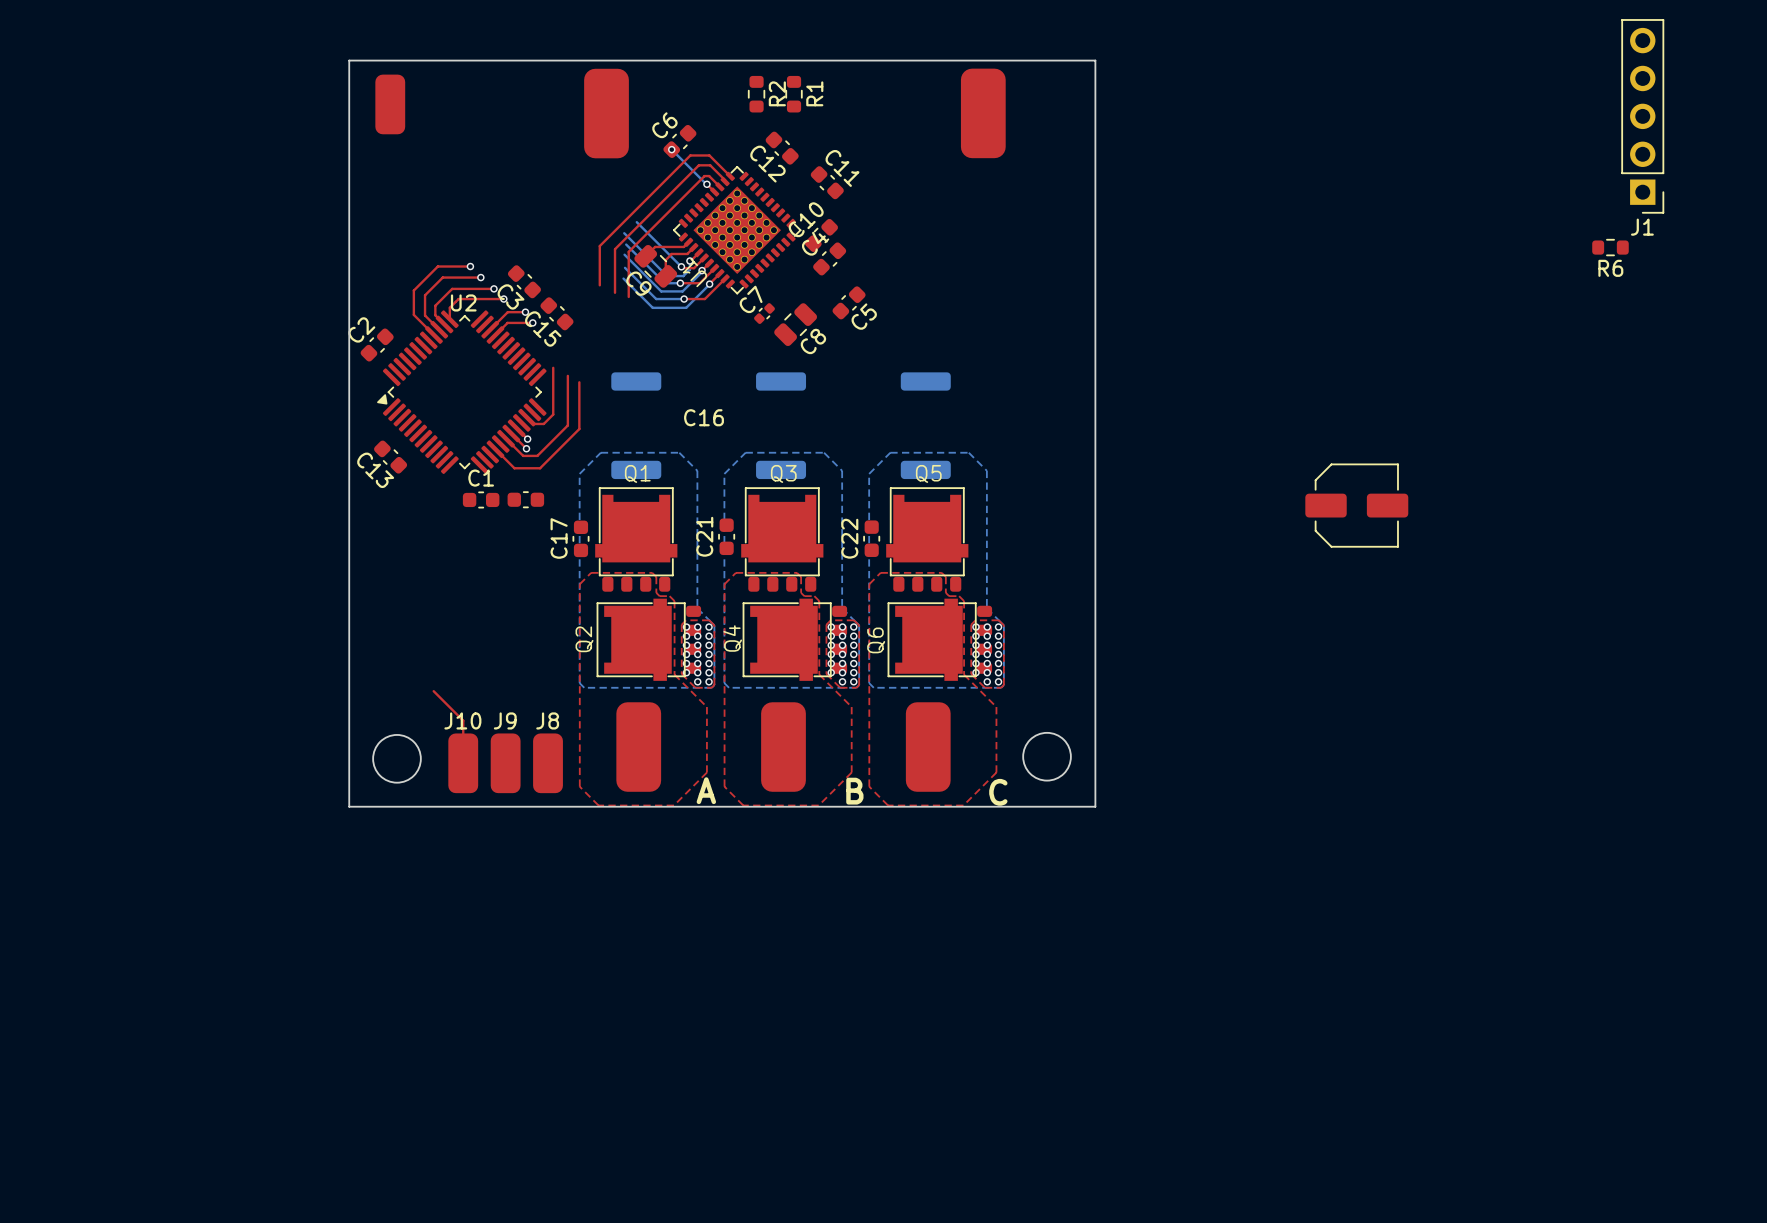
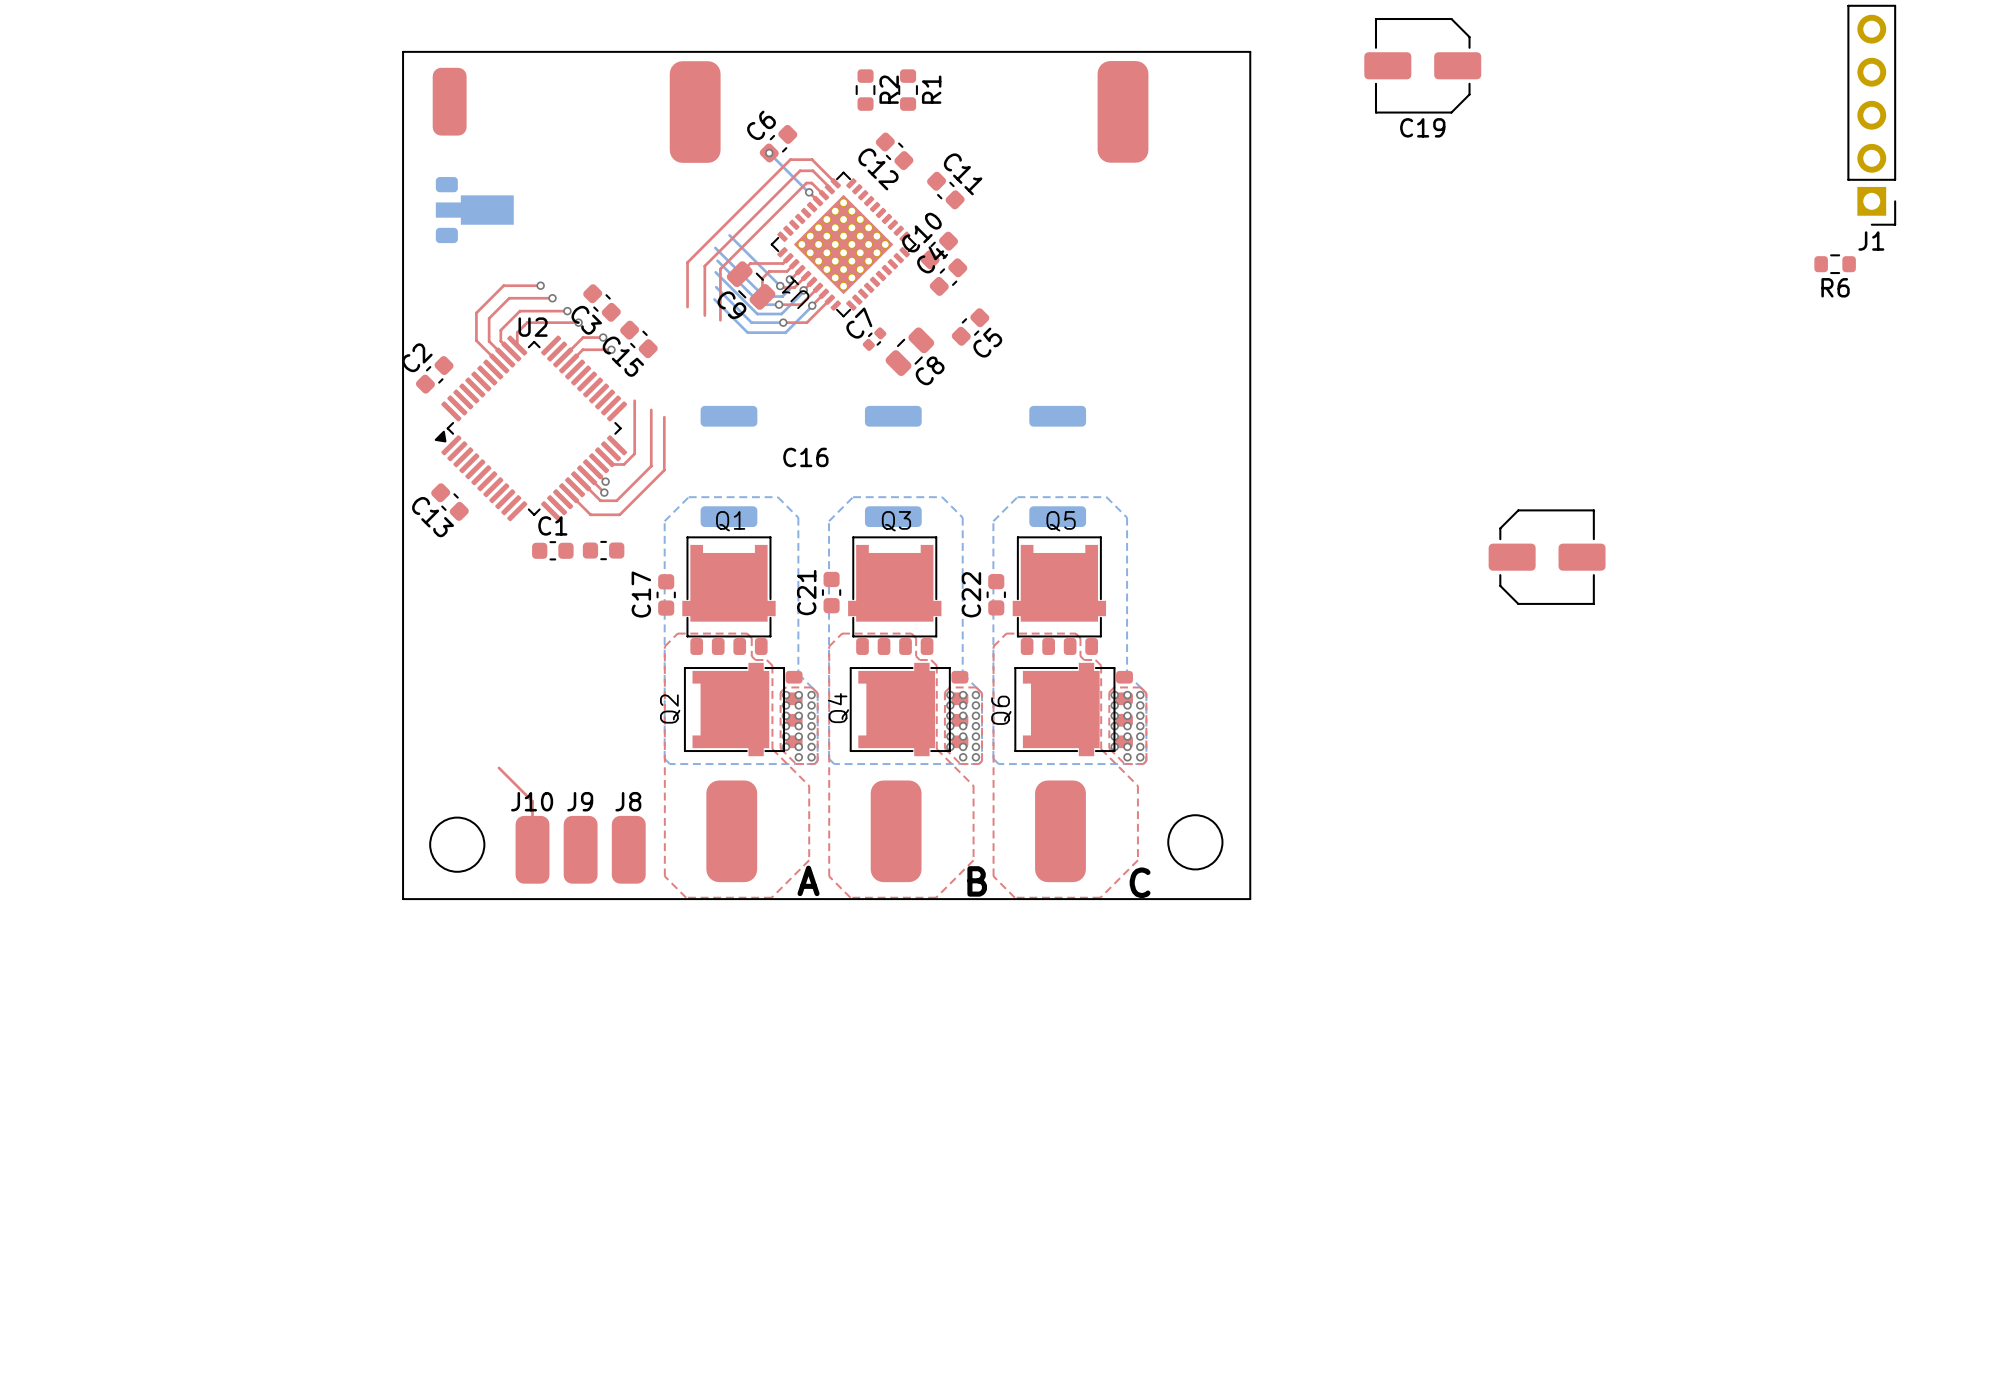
C19: none -> (1422, 65)
part: none -> (474, 210)

